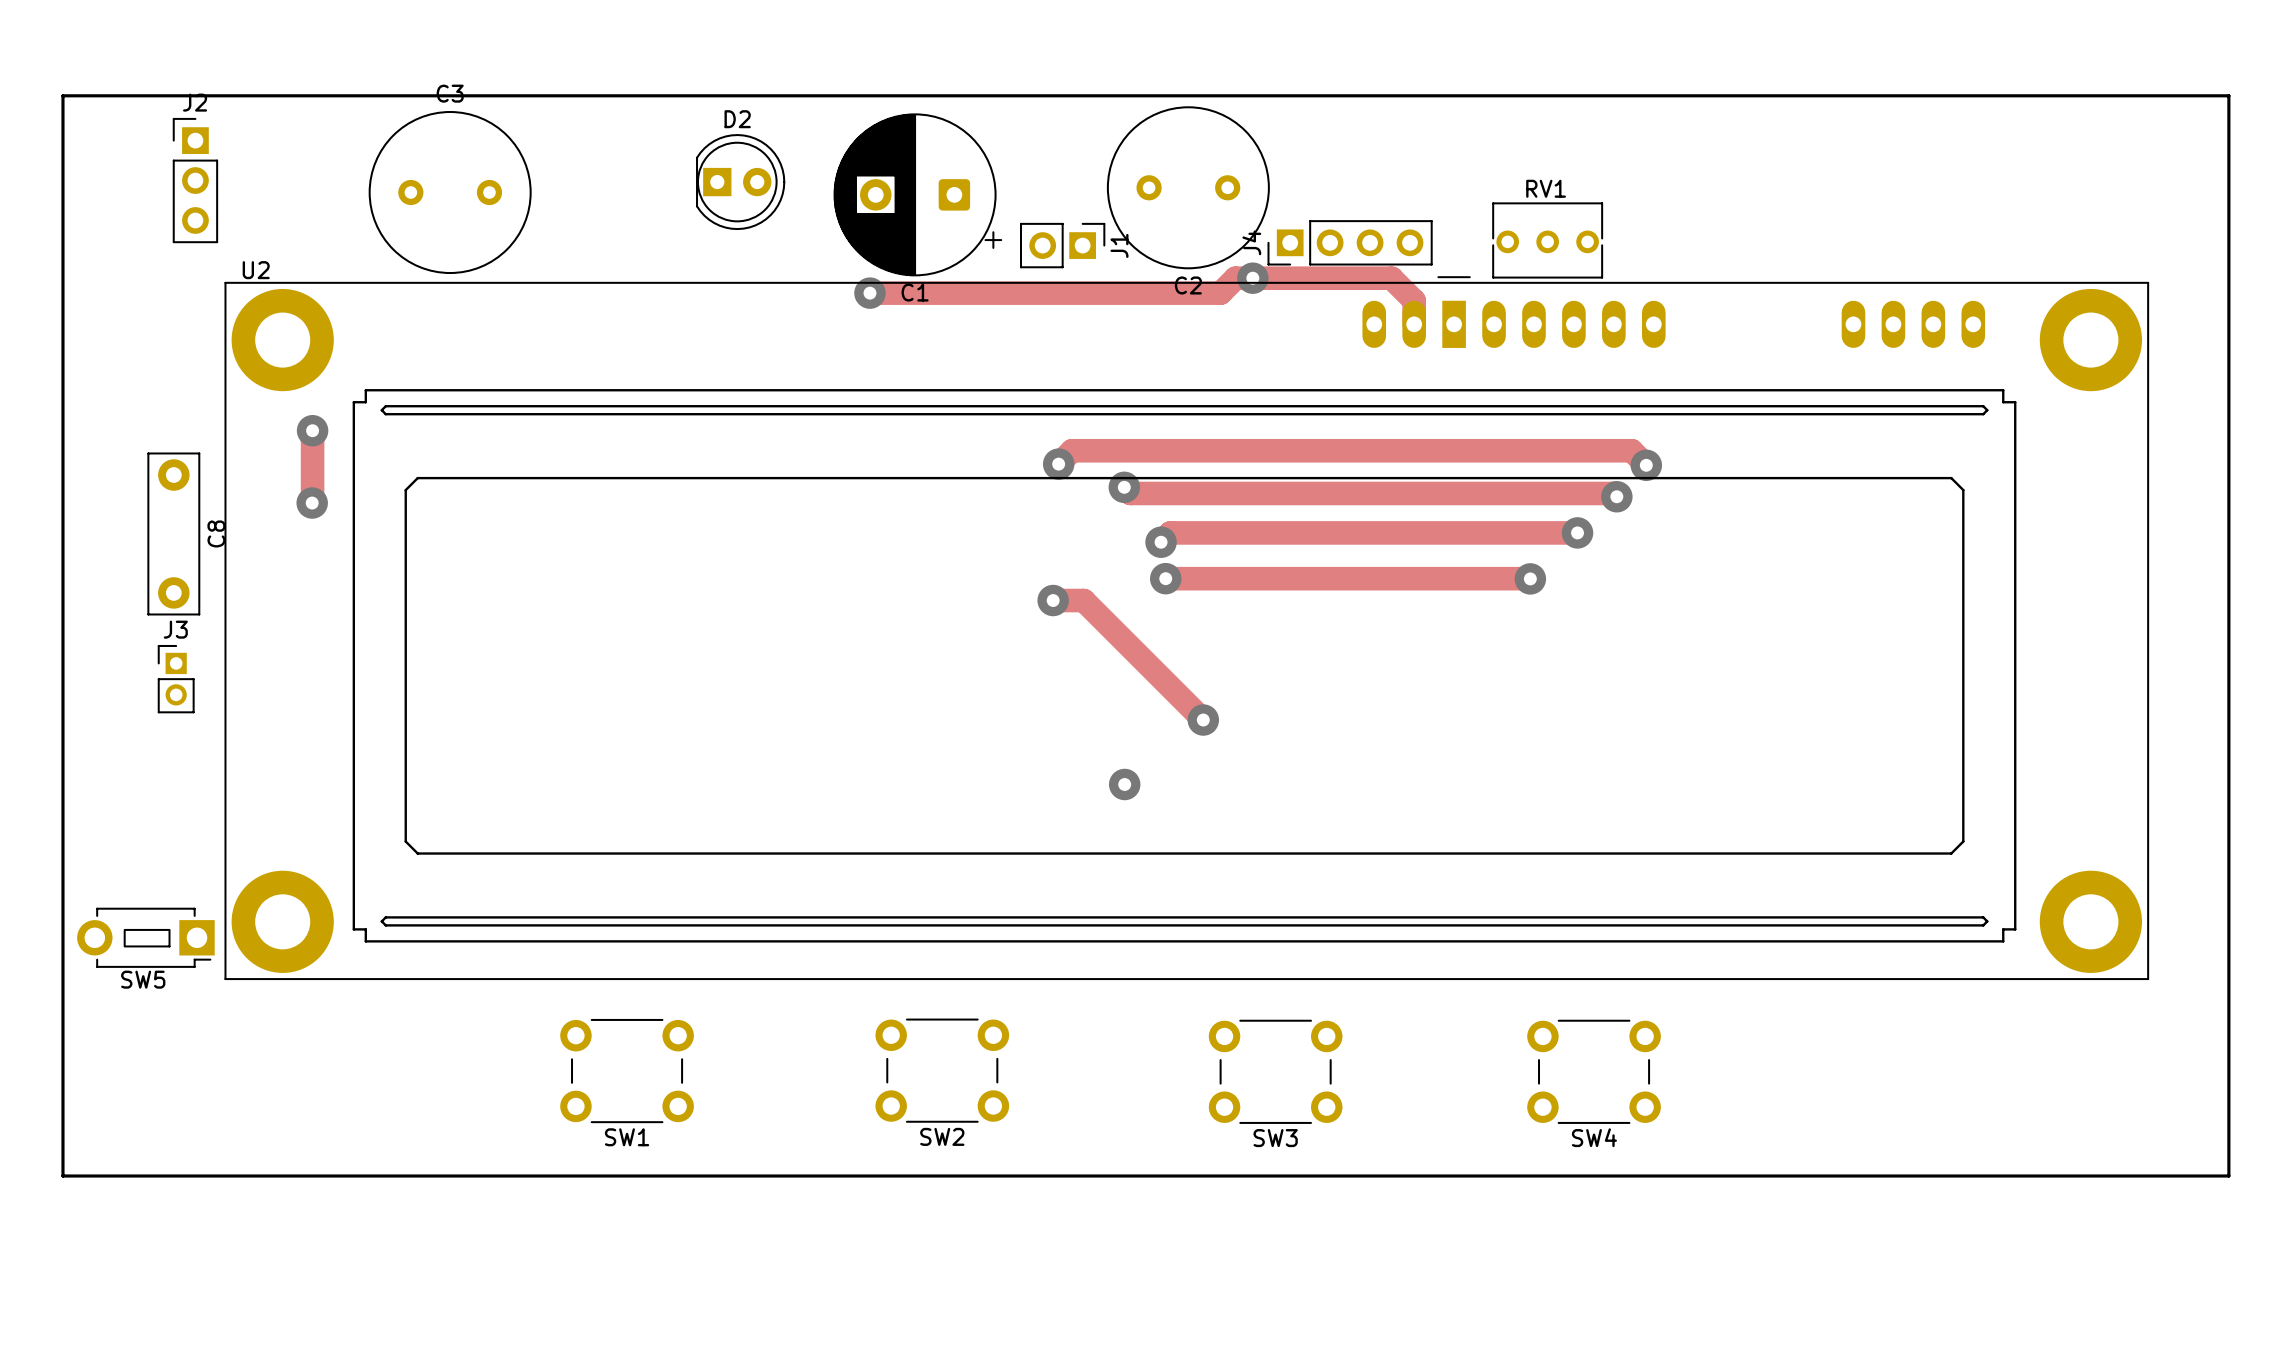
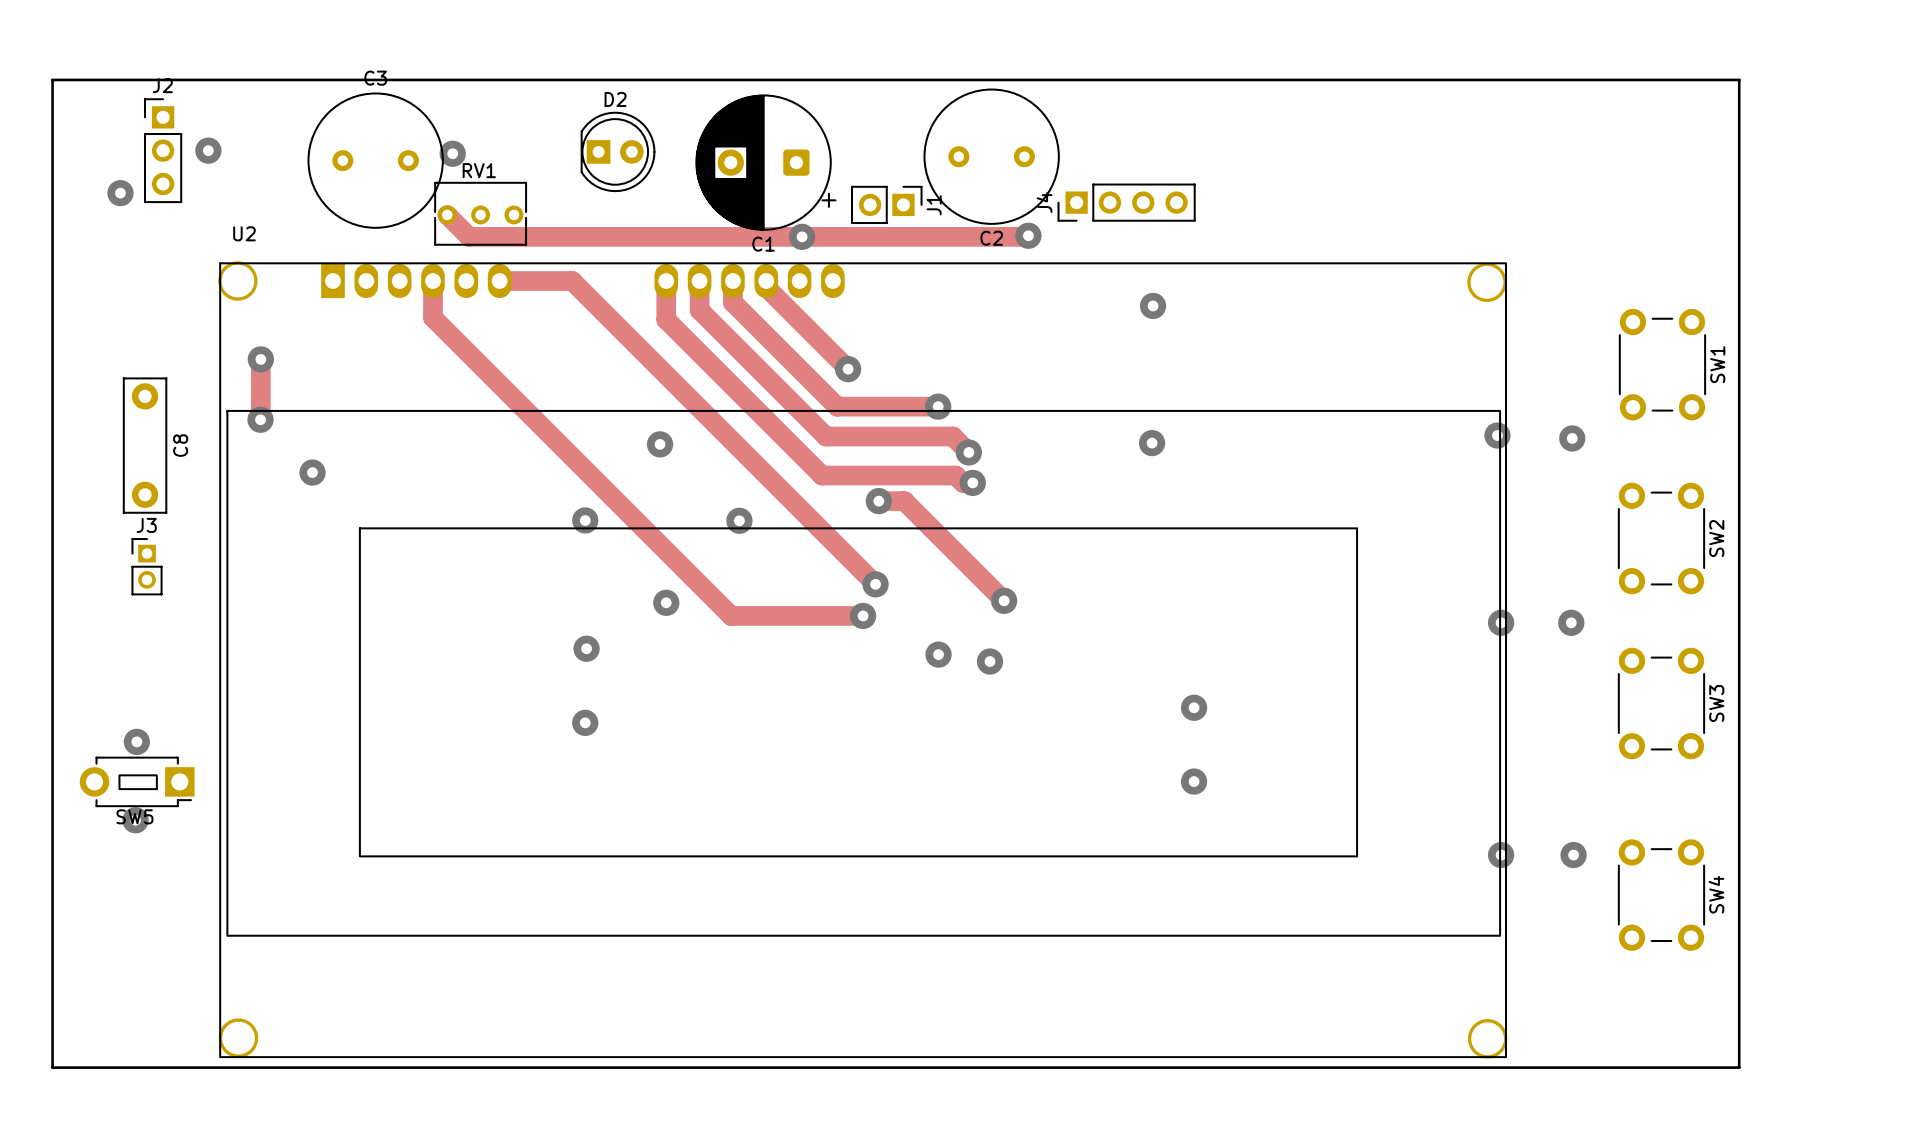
board edge: (2084, 95) (2228, 95) (2228, 1176) (62, 1176) -> (1739, 79) (1739, 1067) (52, 1067) (52, 981)
via: none -> (208, 150)
via: none -> (452, 153)
via: none -> (120, 193)
RV1 position: (1547, 240) -> (480, 213)
track: none -> (447, 214) (469, 236) (1028, 235)
U2 name position: U2 (256, 270) -> U2 (244, 233)
U2 footprint: [224, 276, 2150, 981] -> [218, 261, 1508, 1059]
via position: (1252, 278) -> (1028, 235)
track: (869, 293) (1220, 293) (1235, 278) (1391, 278) (1414, 300) (1414, 324) -> none
via position: (869, 293) -> (802, 236)
track: none -> (432, 281) (432, 317) (731, 615) (863, 615)
track: none -> (499, 281) (572, 281) (875, 584)
track: none -> (766, 281) (766, 287) (848, 369)
via: none -> (1153, 305)
track: (1058, 464) (1072, 450) (1631, 450) (1646, 465) -> none
via position: (1058, 464) -> (848, 369)
via: (1646, 465) -> none
track: (1124, 487) (1130, 493) (1613, 493) (1616, 496) -> (938, 406) (837, 406) (732, 302) (732, 281)
via: (1616, 496) -> none
via: none -> (1497, 435)
via: none -> (1572, 438)
via: none -> (1152, 443)
via: none -> (660, 444)
track: (1577, 532) (1170, 532) (1161, 542) -> (699, 281) (699, 310) (826, 436) (952, 436) (968, 452)
via: (1577, 532) -> none
via: none -> (312, 472)
track: (1165, 578) (1530, 578) -> (972, 482) (963, 482) (955, 475) (822, 475) (666, 319) (666, 281)
via: (1530, 578) -> none
via: none -> (585, 520)
via: none -> (739, 520)
via: none -> (875, 584)
via: none -> (666, 602)
via: none -> (863, 615)
via: none -> (1501, 622)
via: none -> (1571, 622)
via: none -> (586, 648)
via: none -> (990, 661)
via: none -> (1194, 707)
via: none -> (585, 722)
via: none -> (136, 741)
via: none -> (1194, 781)
SW5 position: (145, 937) -> (137, 781)
via: none -> (135, 820)
via: none -> (1501, 855)
via: none -> (1573, 855)
SW2 rotation: 0° (942, 1070) -> 90° clockwise (1661, 538)
SW2 position: (942, 1070) -> (1661, 538)
SW1 rotation: 0° (627, 1071) -> 90° clockwise (1662, 364)
SW1 position: (627, 1071) -> (1662, 364)
SW3 rotation: 0° (1275, 1071) -> 90° clockwise (1661, 703)
SW3 position: (1275, 1071) -> (1661, 703)
SW4 rotation: 0° (1594, 1071) -> 90° clockwise (1661, 895)
SW4 position: (1594, 1071) -> (1661, 895)
SW2 name position: SW2 (942, 1136) -> SW2 (1716, 538)
SW1 name position: SW1 (627, 1137) -> SW1 (1717, 364)
SW4 name position: SW4 (1594, 1137) -> SW4 (1716, 894)
SW3 name position: SW3 (1275, 1138) -> SW3 (1716, 703)

